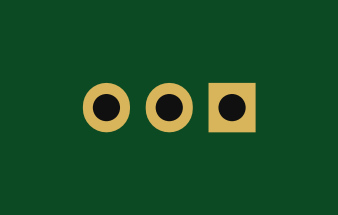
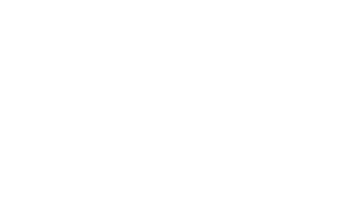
part: (169, 107) -> none

